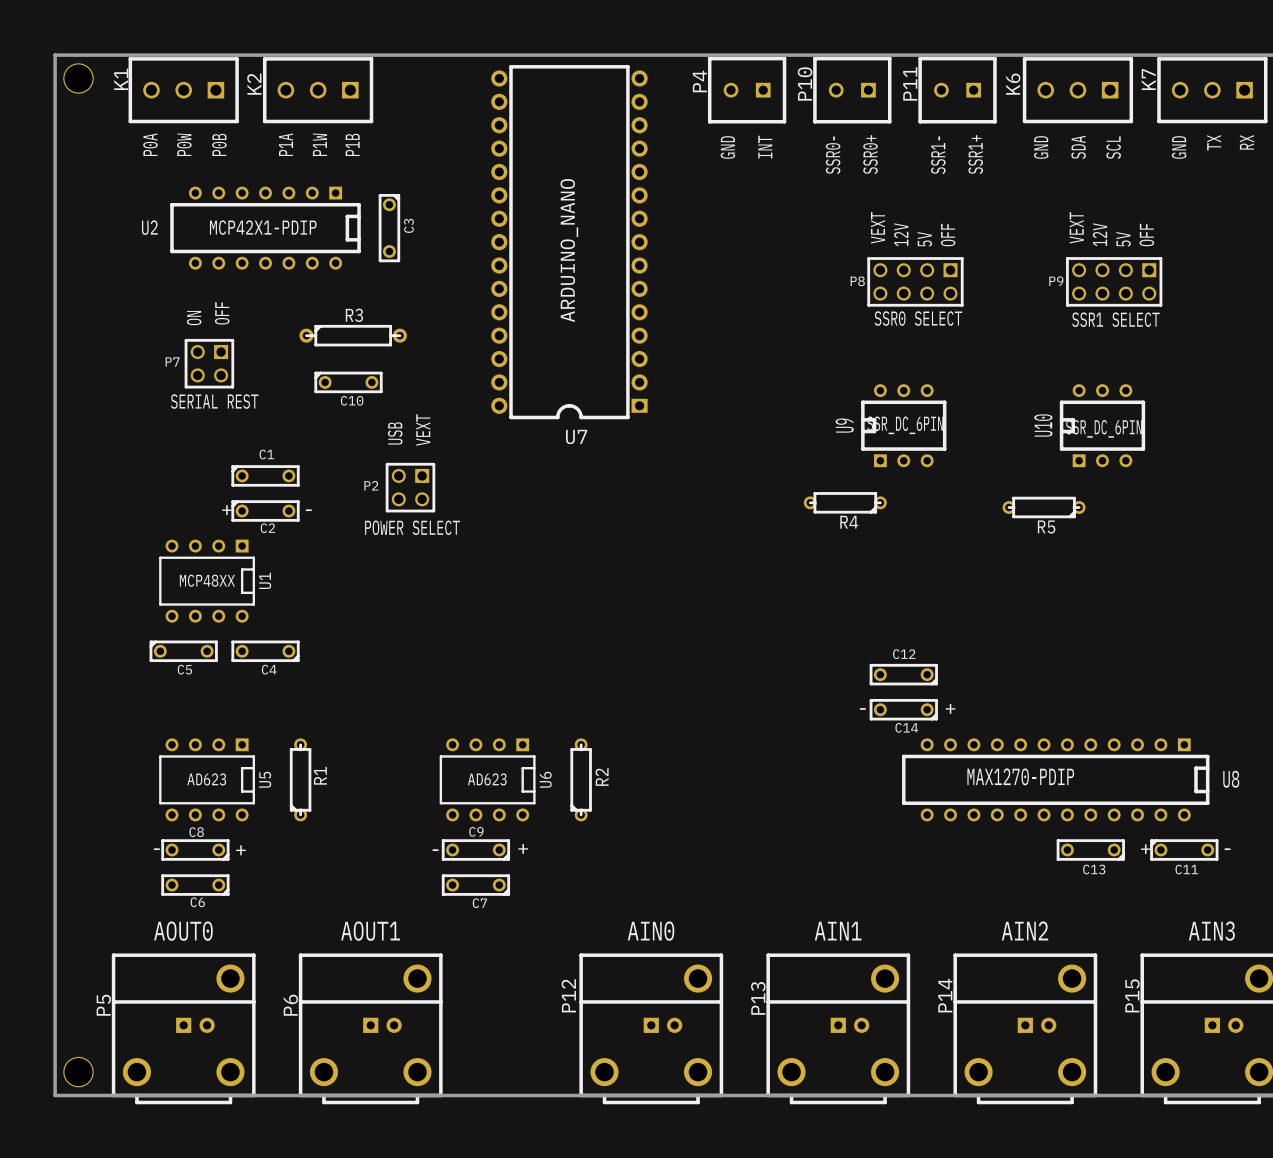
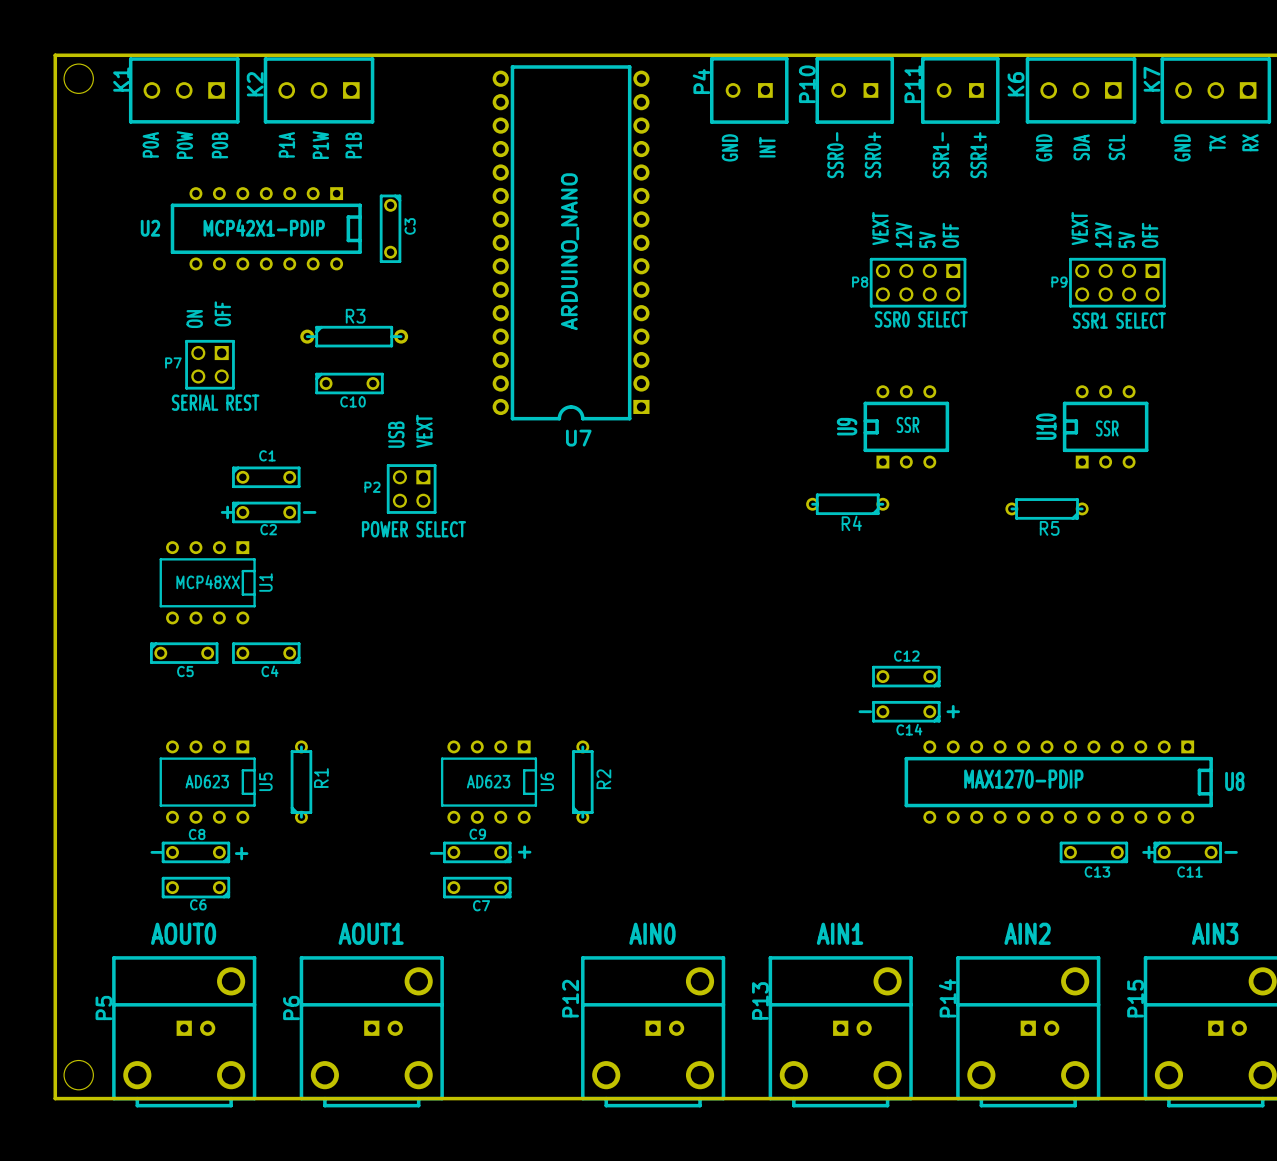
U9 value: SSR_DC_6PIN (905, 425) -> SSR (907, 424)
U10 value: SSR_DC_6PIN (1103, 428) -> SSR (1107, 428)

